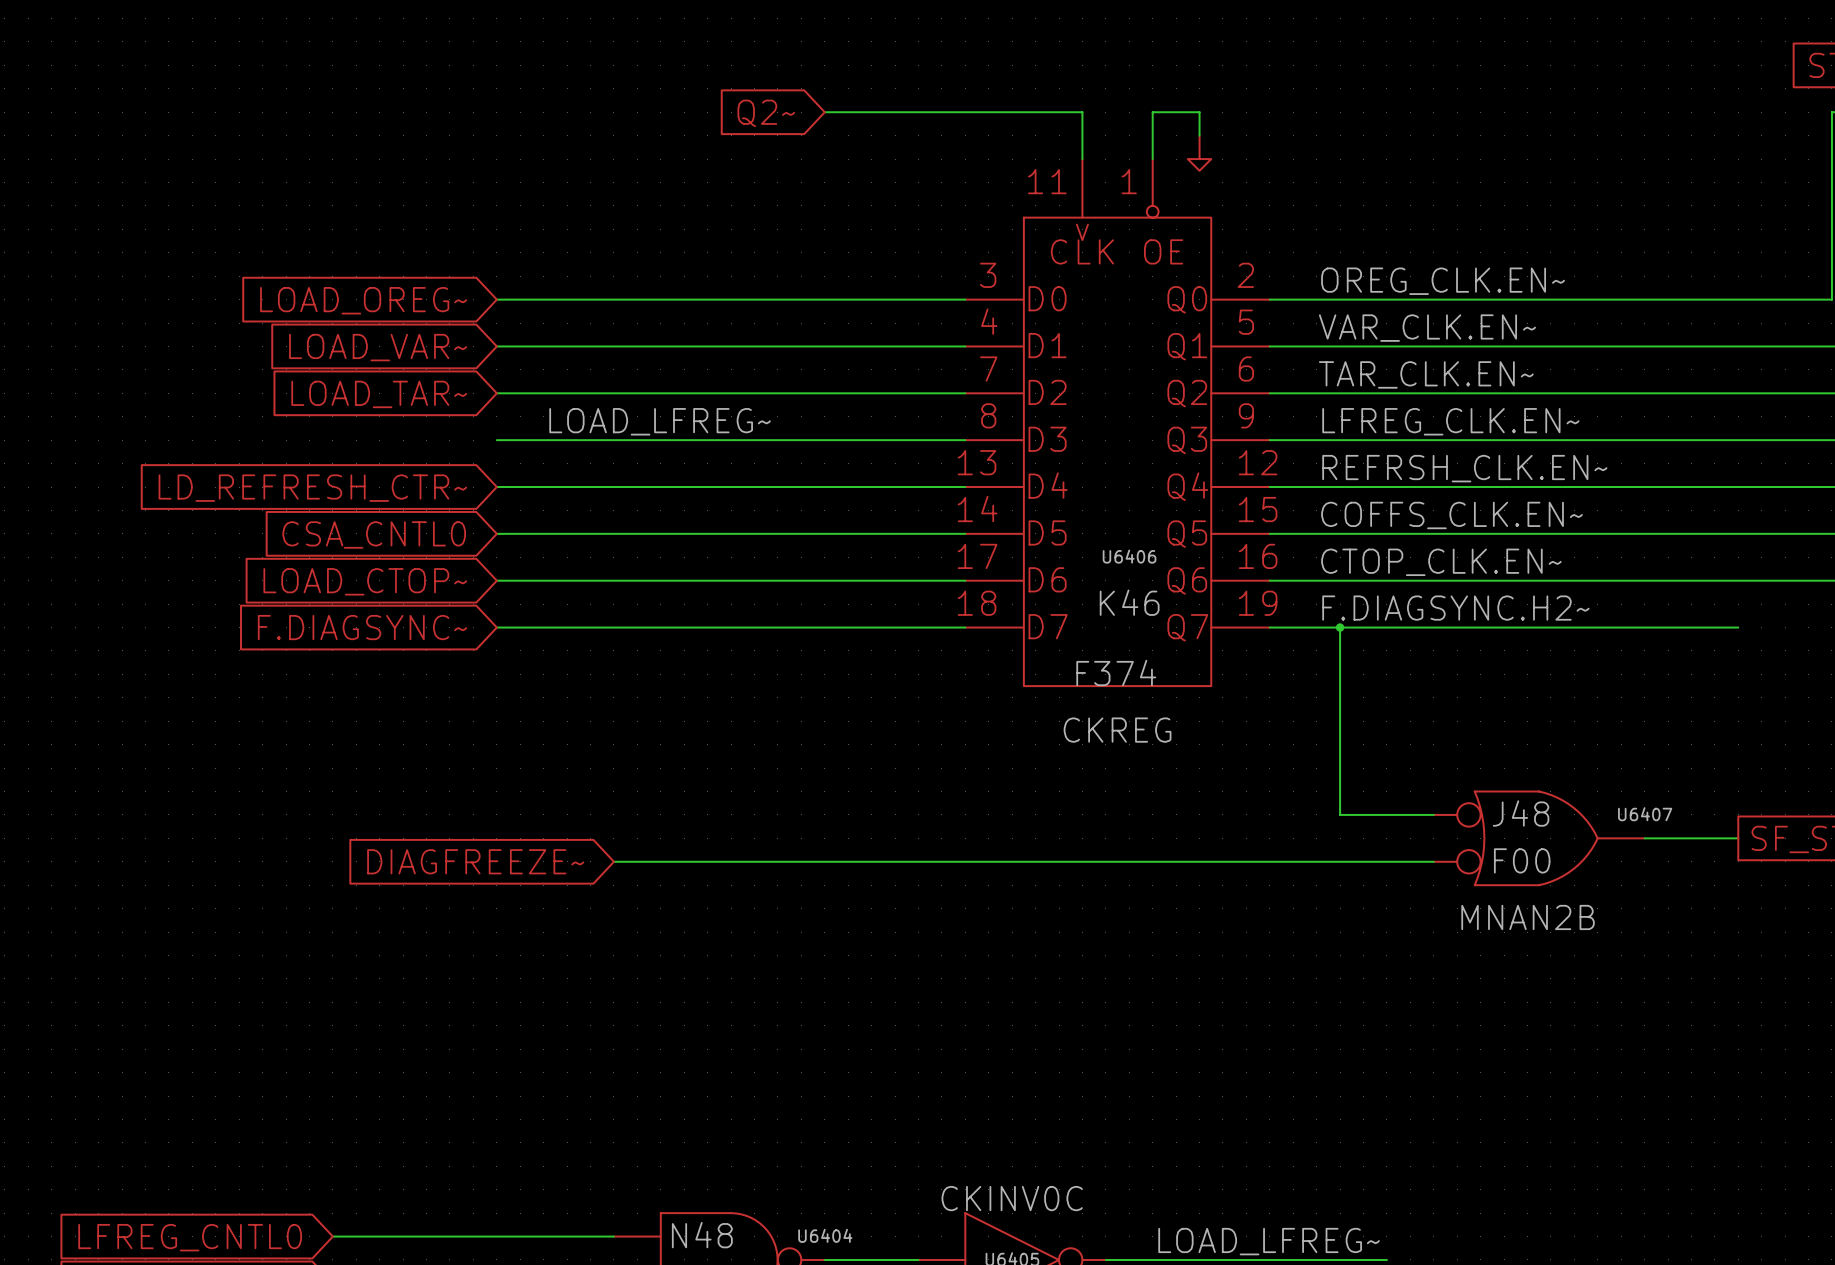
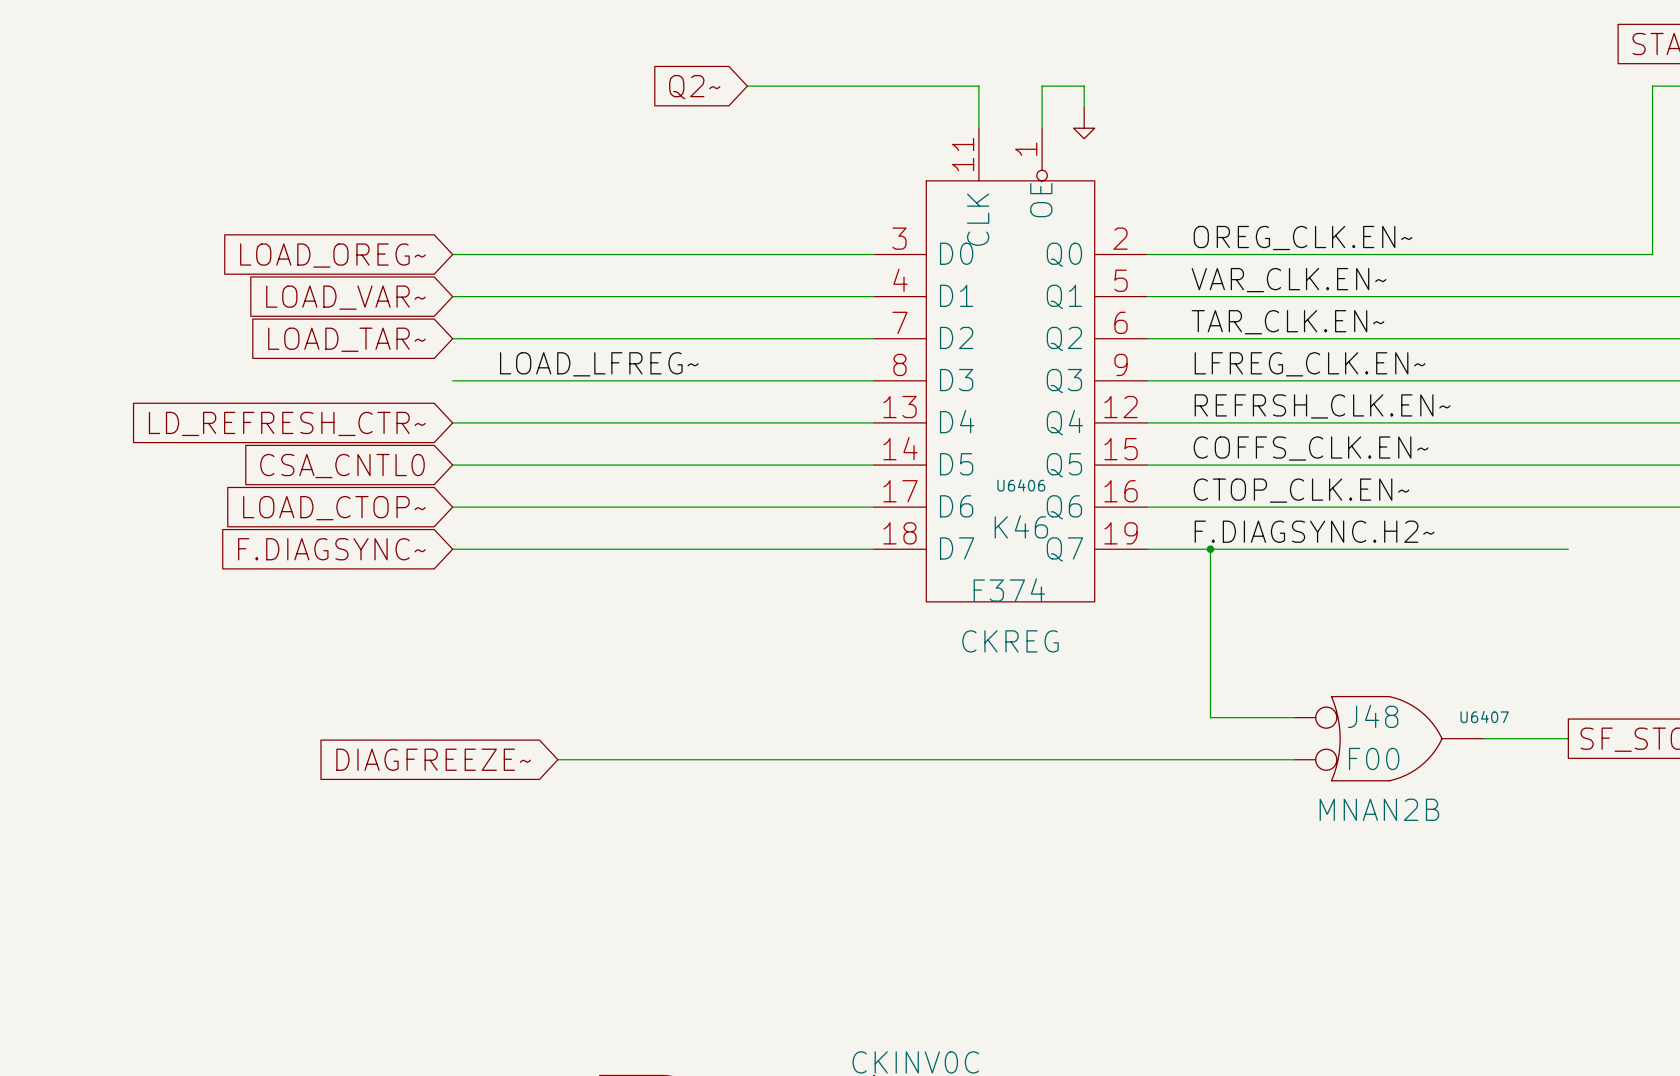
U6406 symbol: [965, 159, 1270, 687] -> [873, 128, 1148, 602]

